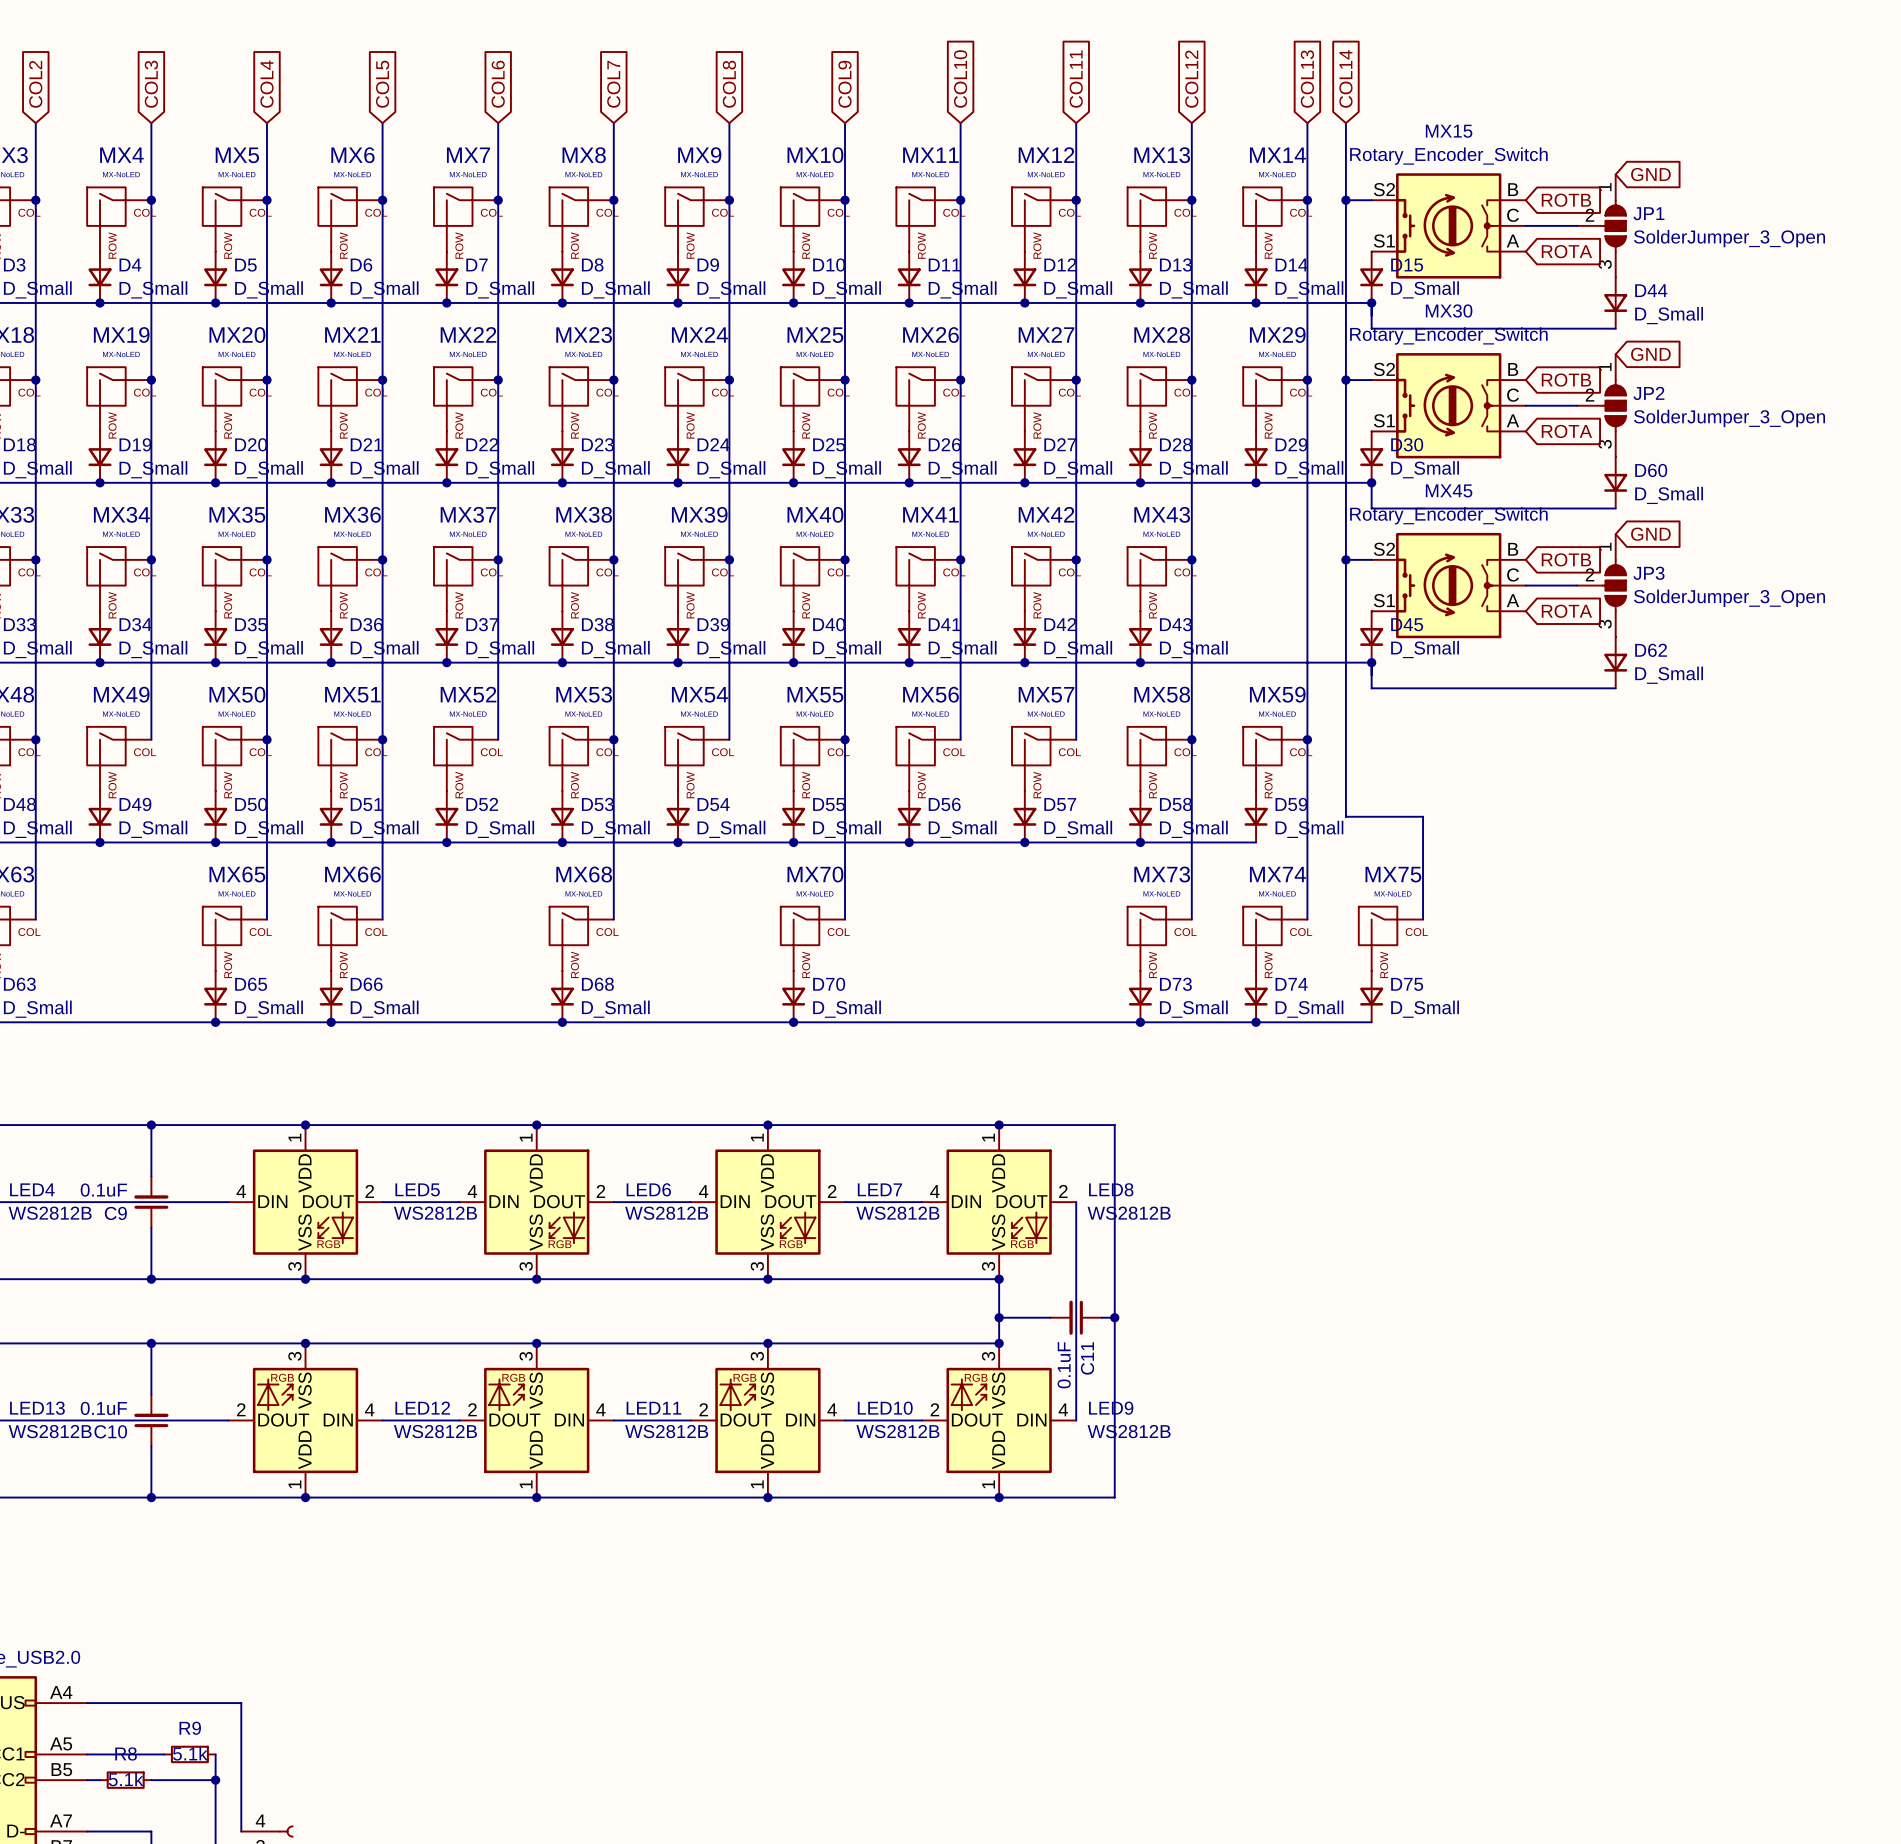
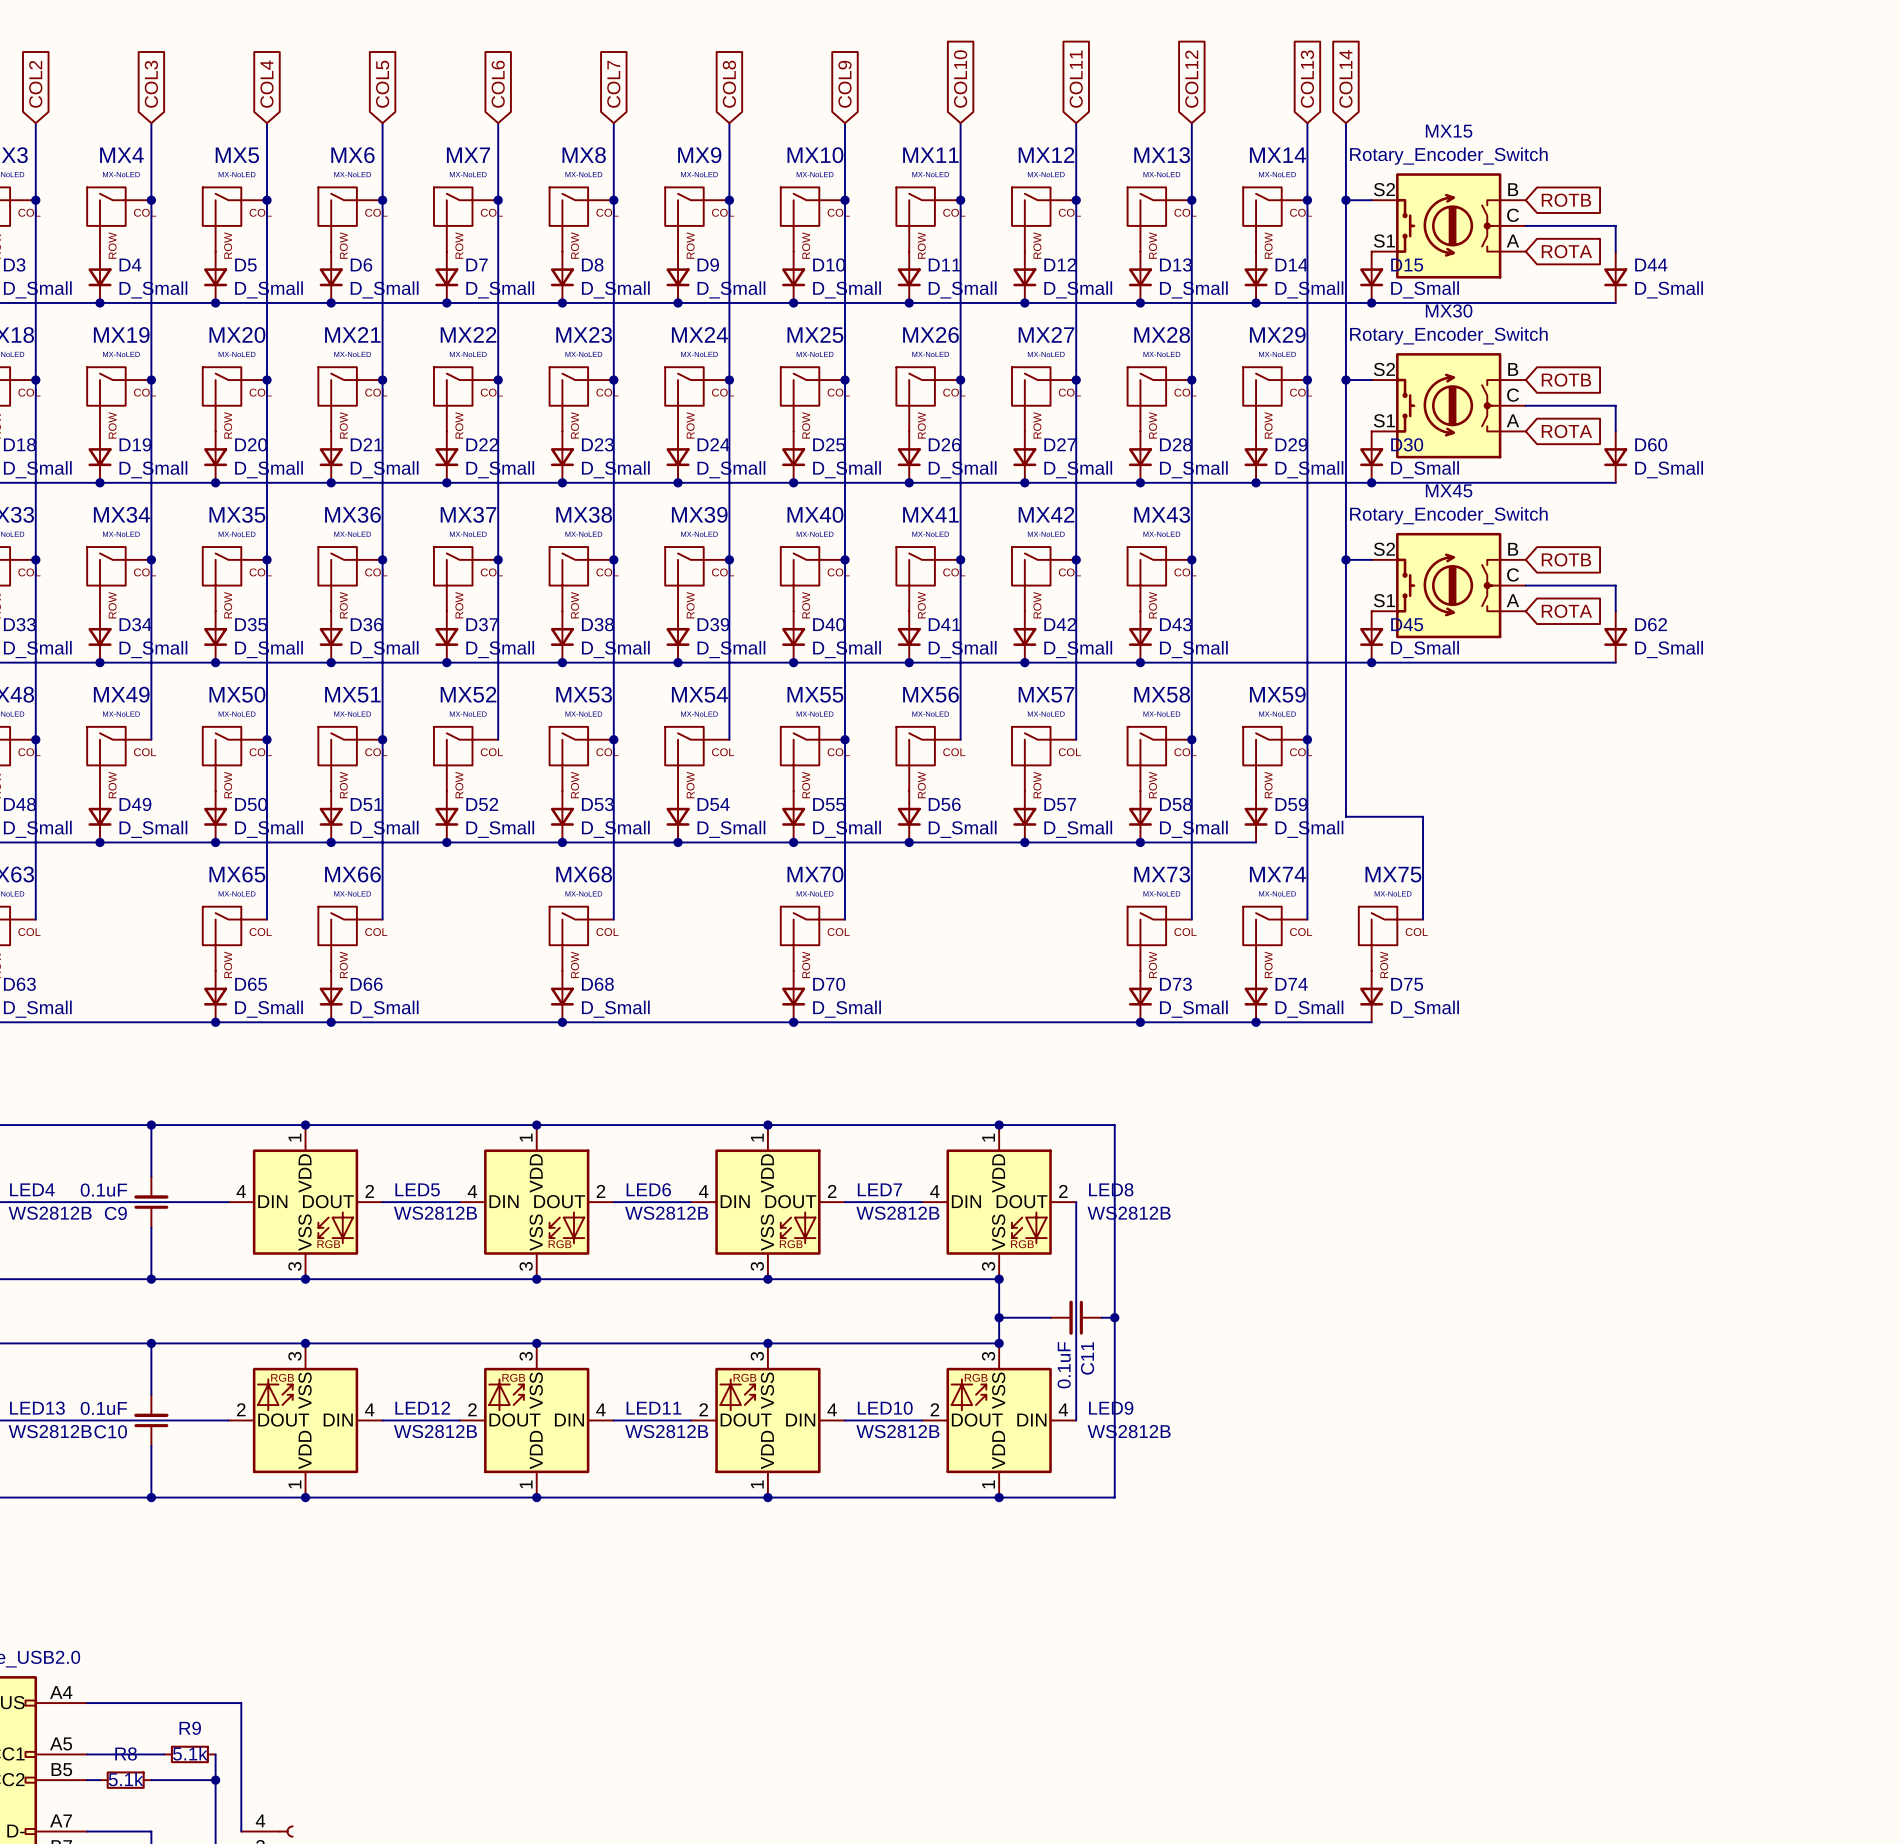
global label: GND (1650, 174) -> none
JP1: SolderJumper_3_Open (1601, 225) -> none
wire: (1371, 302) (1371, 328) (1615, 328) -> (1371, 302) (1615, 302)
D44 position: (1615, 302) -> (1615, 277)
global label: GND (1650, 354) -> none
JP2: SolderJumper_3_Open (1601, 405) -> none
wire: (1371, 482) (1371, 508) (1615, 508) -> (1371, 482) (1615, 482)
D60 position: (1615, 482) -> (1615, 457)
global label: GND (1650, 534) -> none
JP3: SolderJumper_3_Open (1601, 585) -> none
wire: (1371, 662) (1371, 688) (1615, 688) -> (1371, 662) (1615, 662)
D62 position: (1615, 662) -> (1615, 636)

